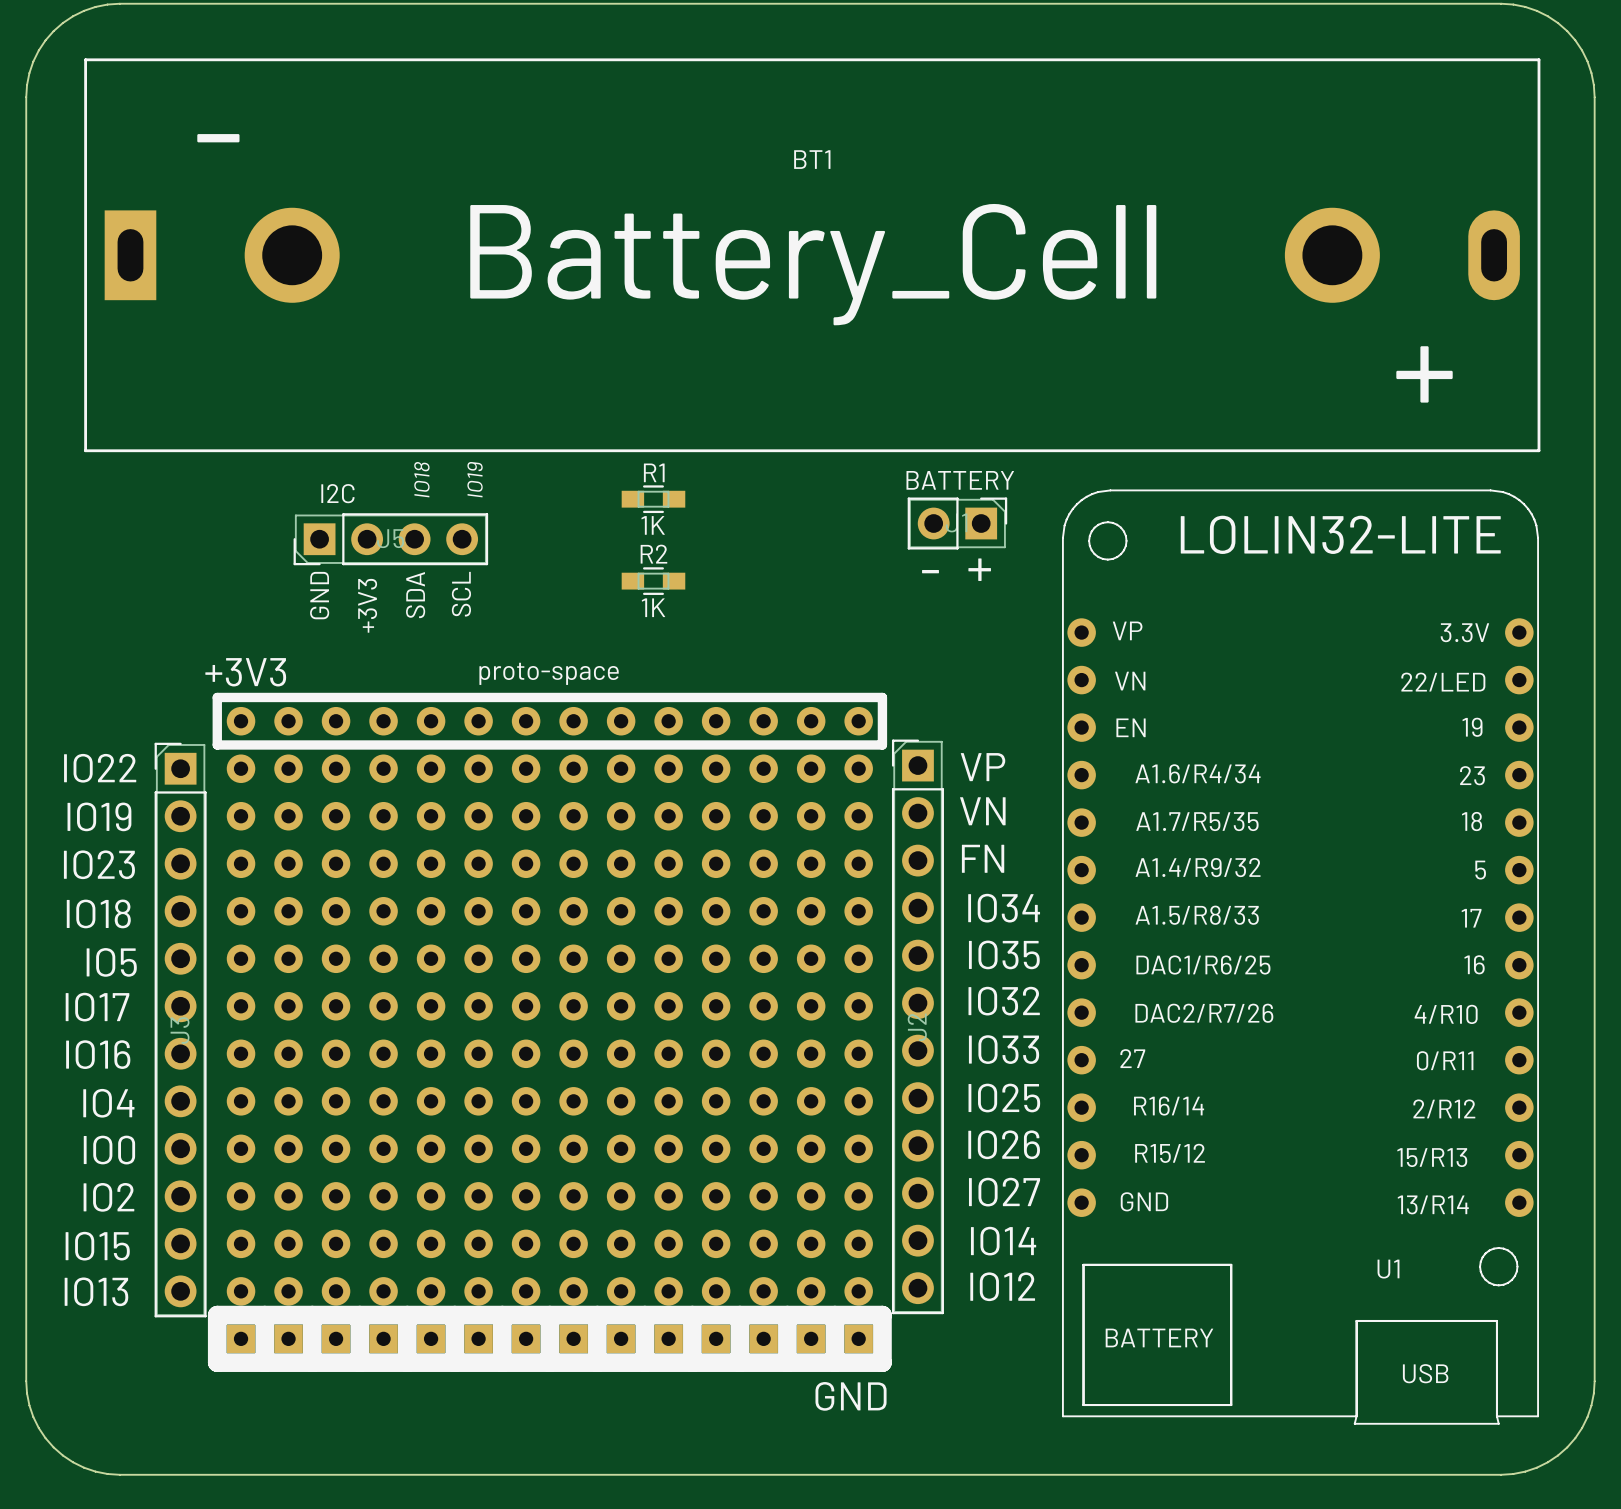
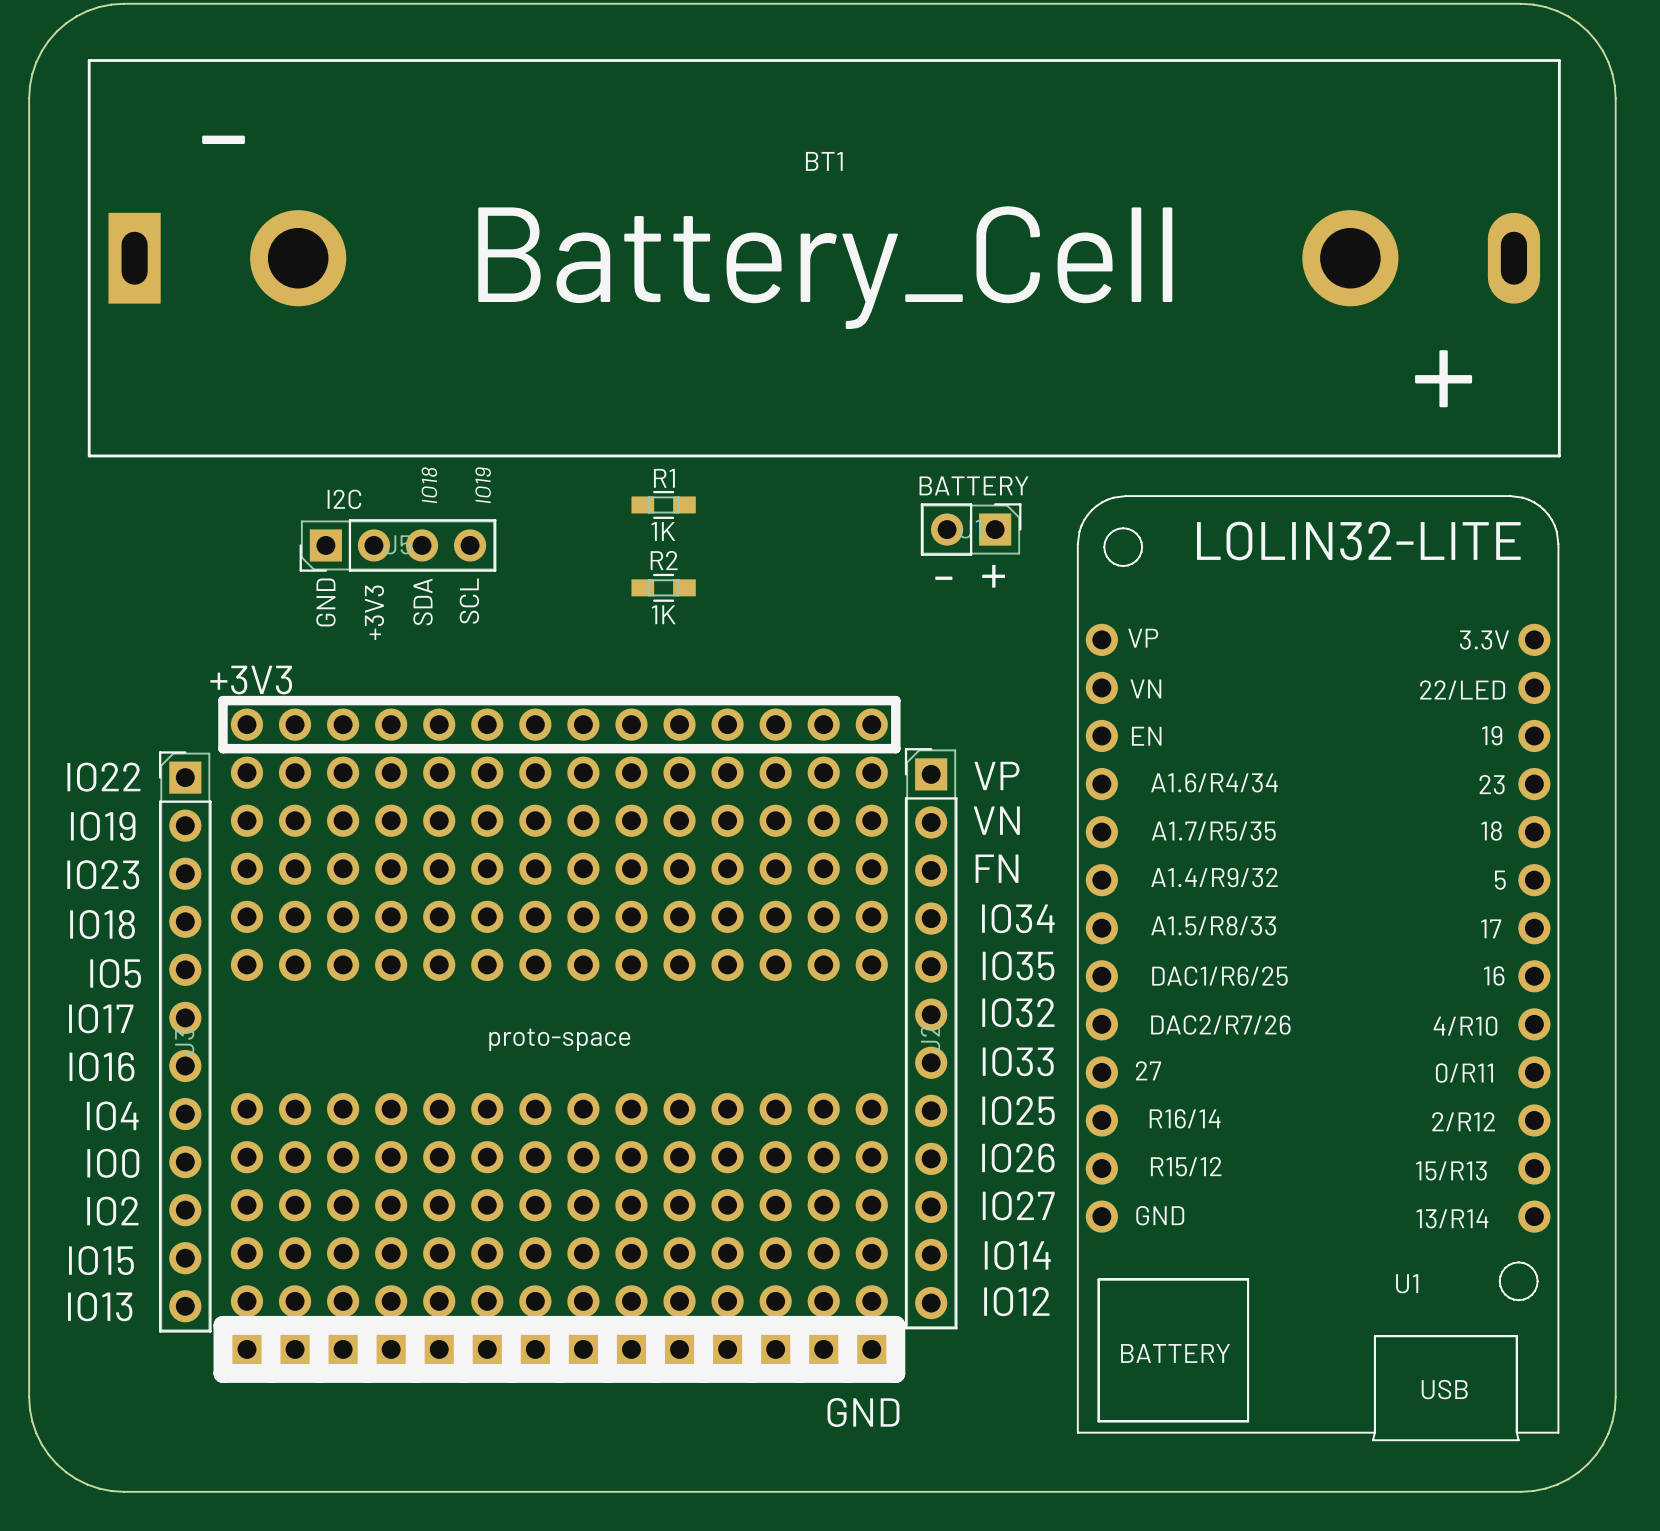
U1 footprint: [1062, 489, 1539, 1425] -> [1076, 495, 1560, 1442]
part value position: proto-space (549, 673) -> proto-space (559, 1039)
part footprint: [207, 692, 892, 1372] -> [213, 695, 906, 1383]

